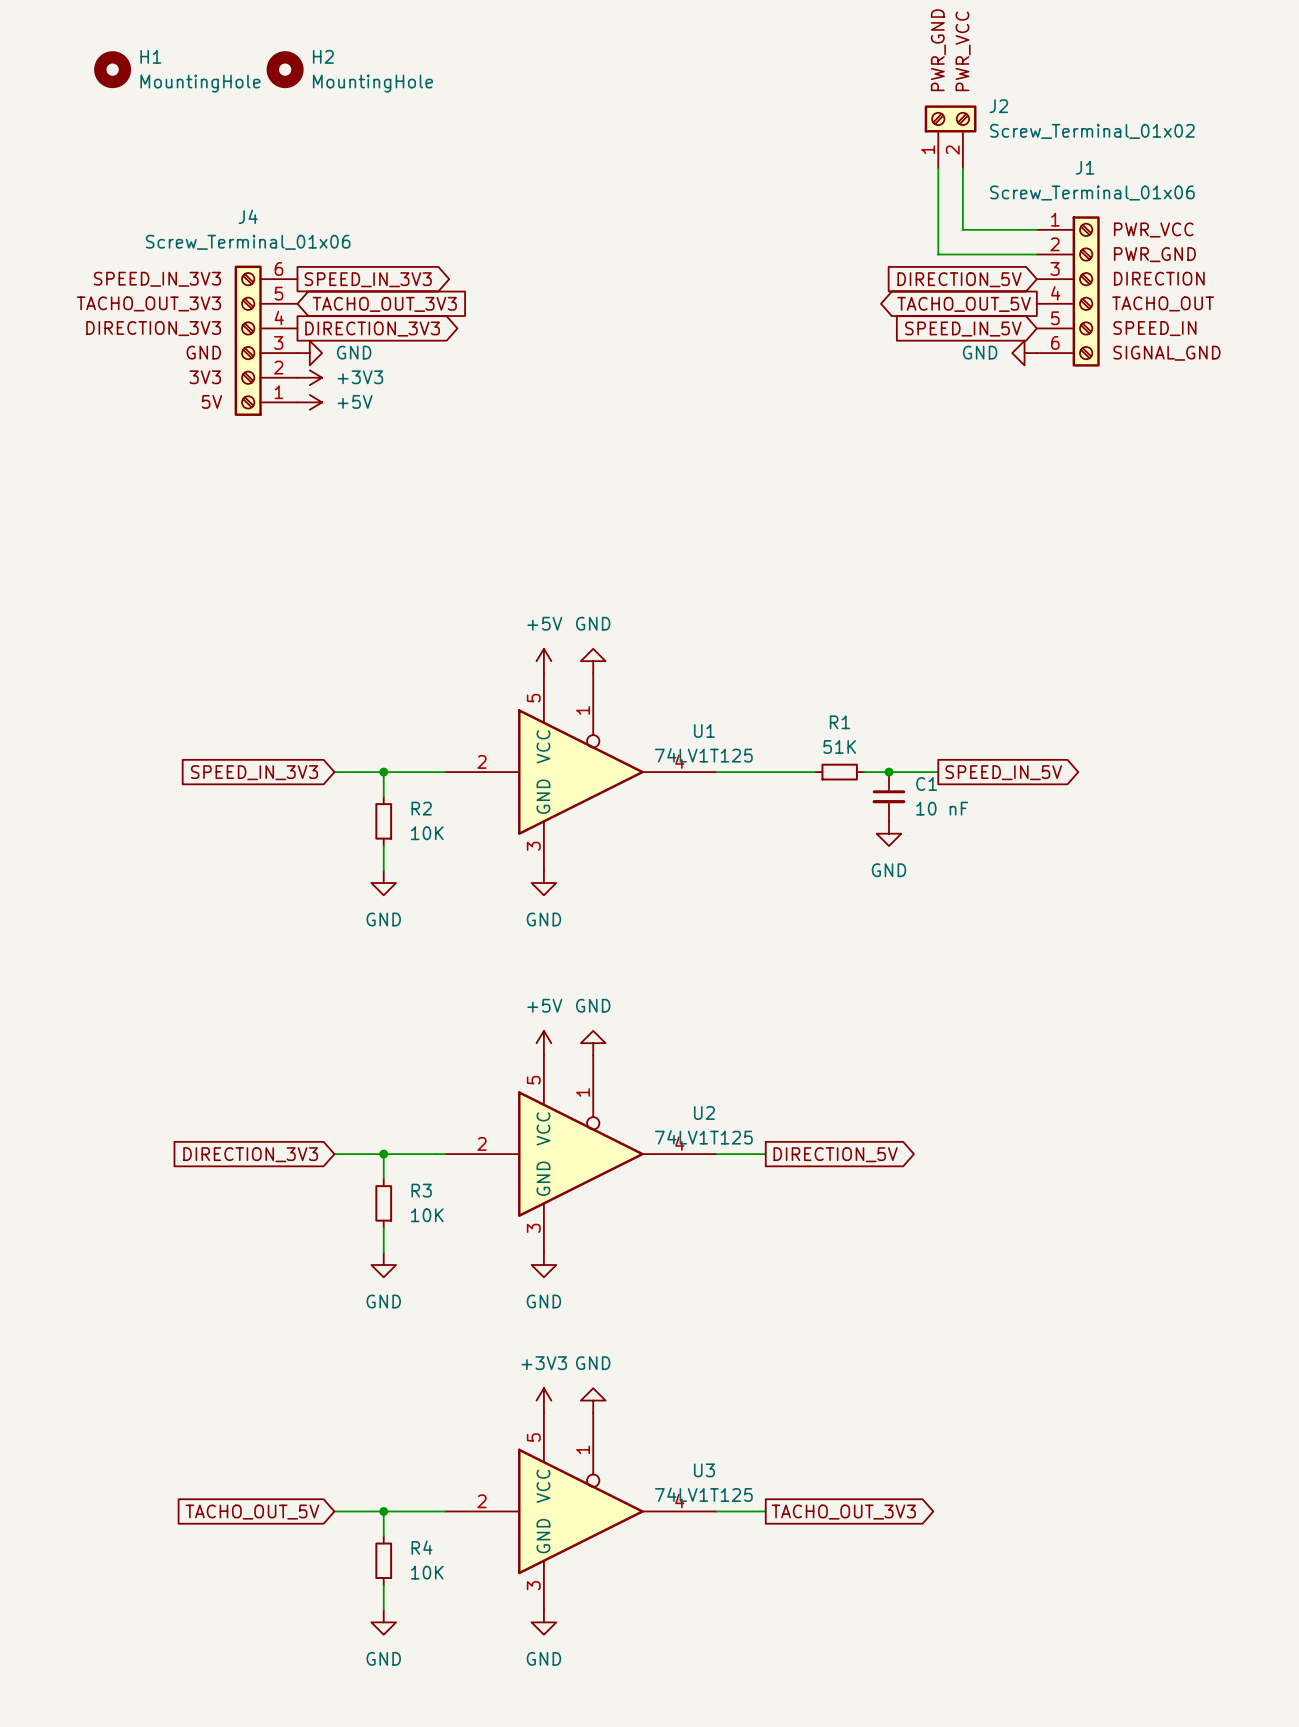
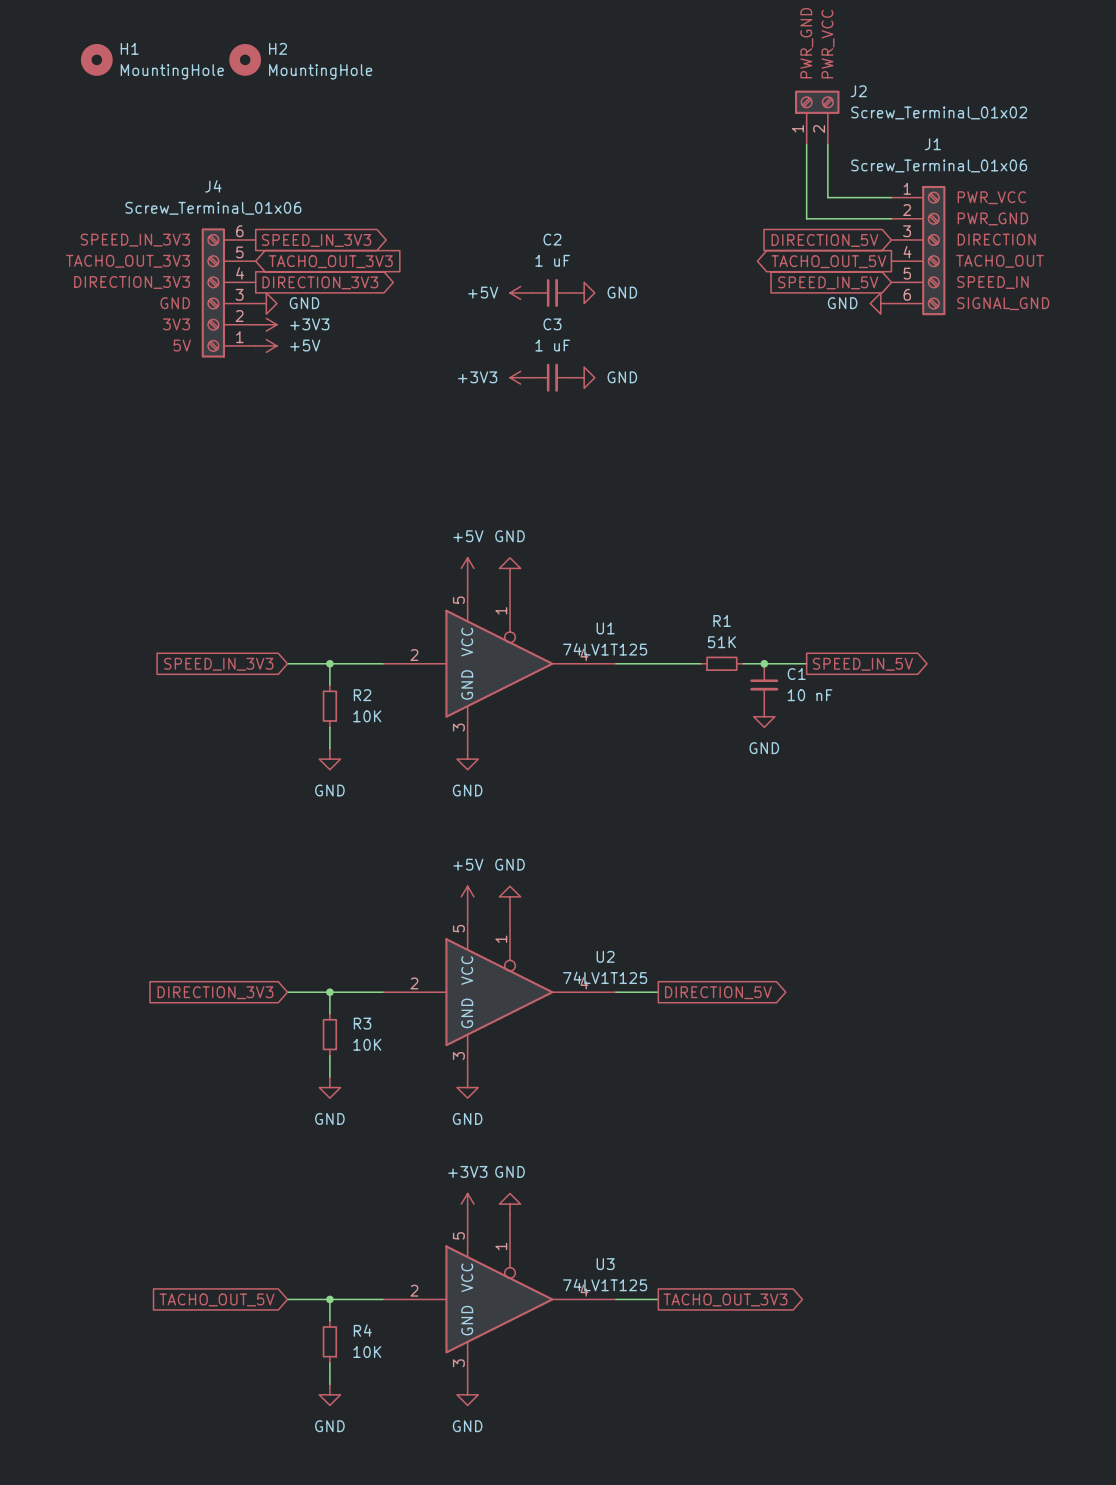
power symbol: none -> +5V (520, 292)
C2: none -> 1 uF (552, 292)
power symbol: none -> GND (584, 292)
power symbol: none -> +3V3 (520, 377)
C3: none -> 1 uF (552, 377)
power symbol: none -> GND (584, 377)

